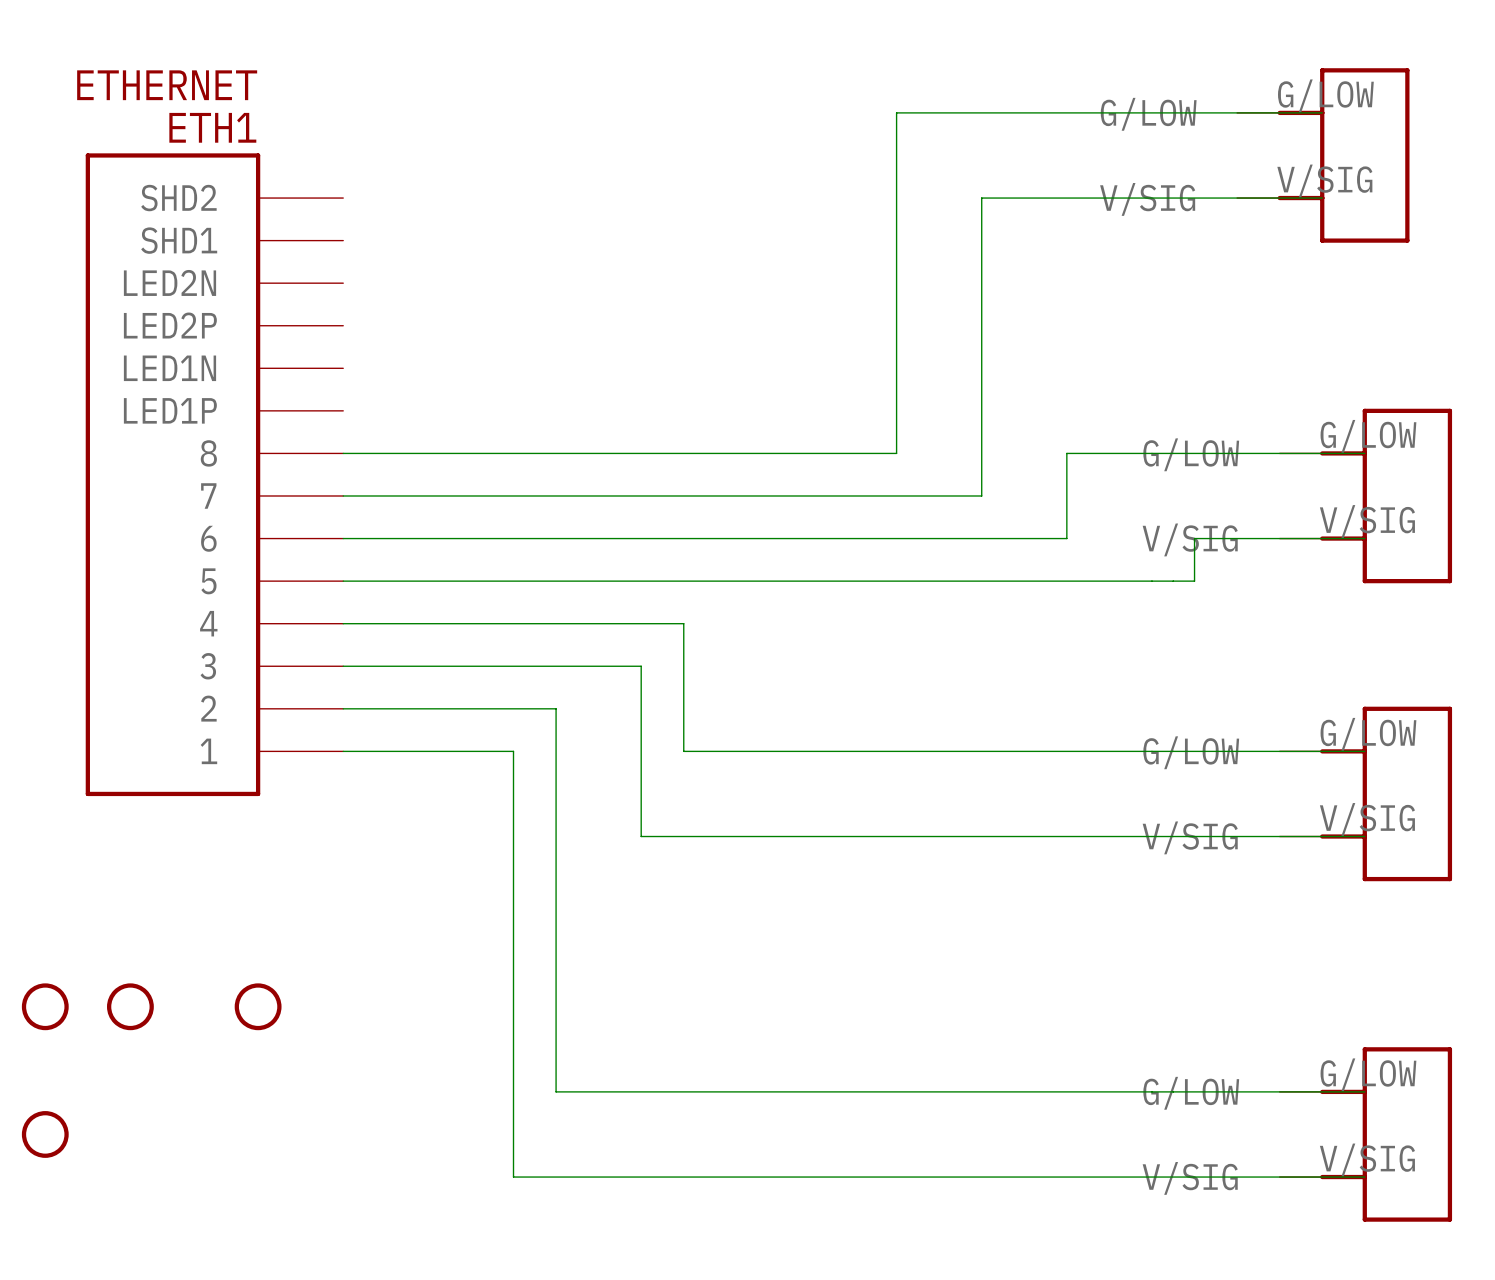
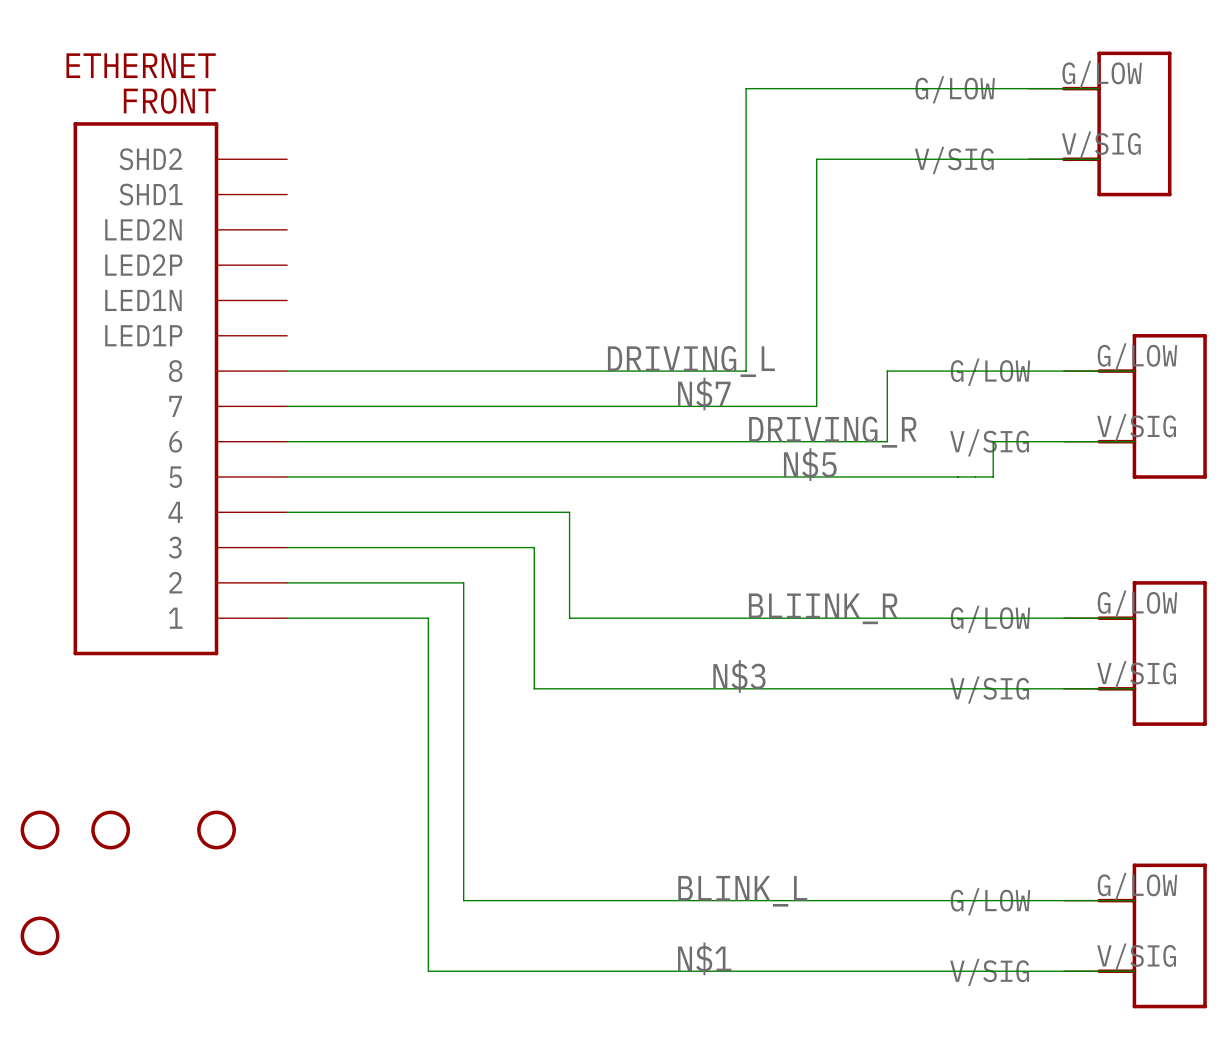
ETH1 name: ETH1 (212, 127) -> FRONT (169, 101)
label: none -> DRIVING_L (691, 361)
label: none -> N$7 (704, 394)
label: none -> DRIVING_R (832, 432)
label: none -> N$5 (810, 464)
label: none -> BLIINK_R (823, 608)
label: none -> N$3 (739, 676)
label: none -> BLINK_L (742, 891)
label: none -> N$1 (704, 958)

